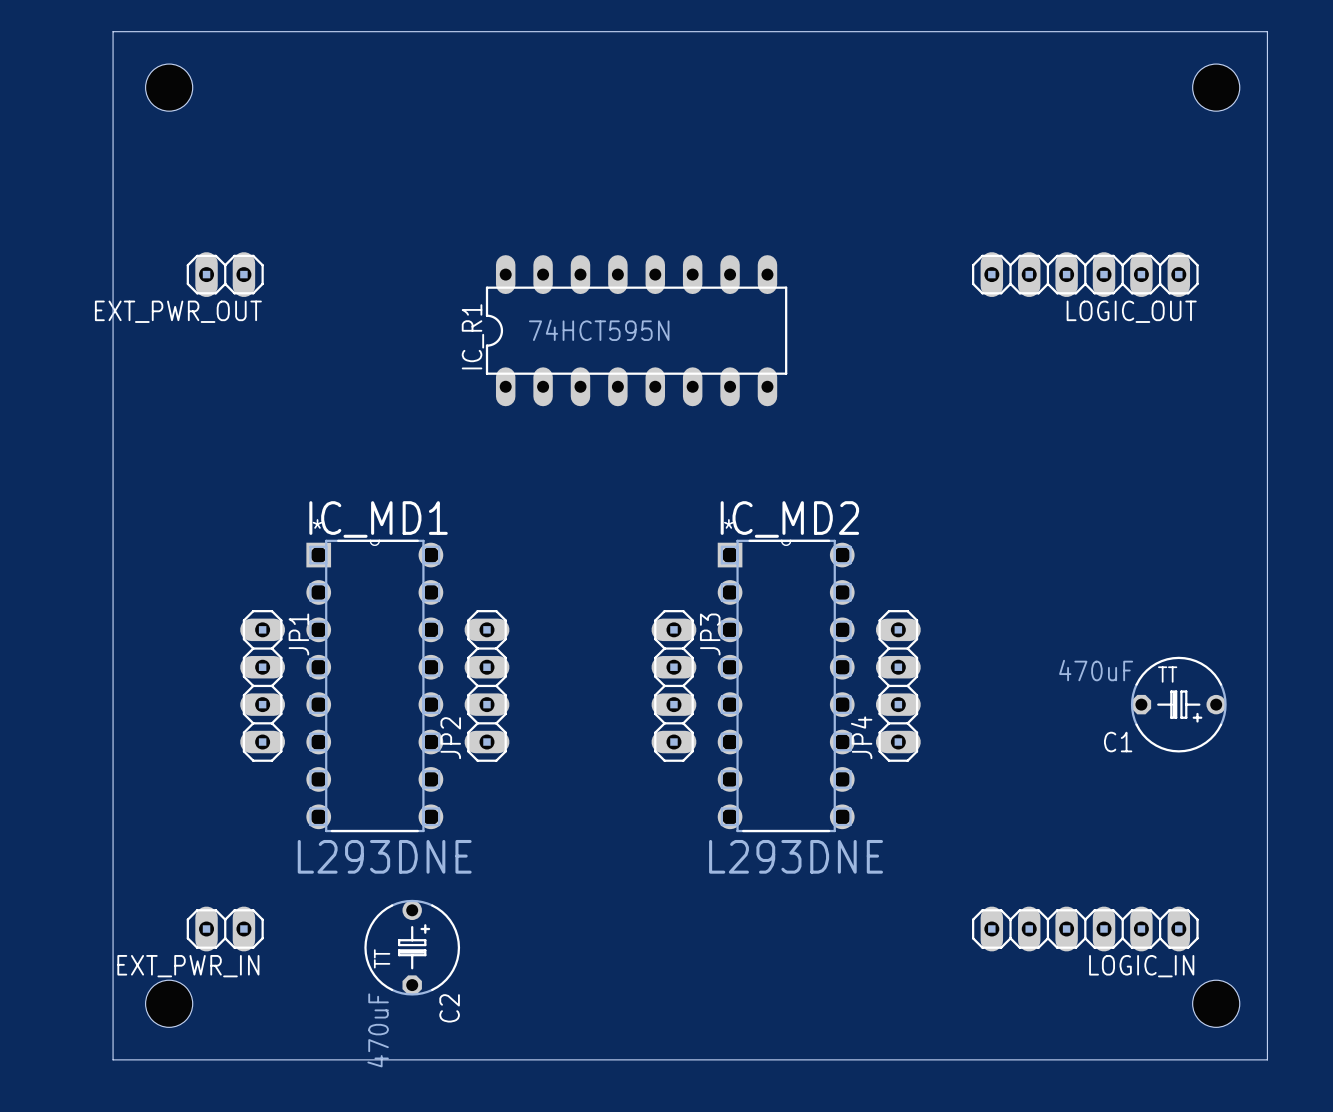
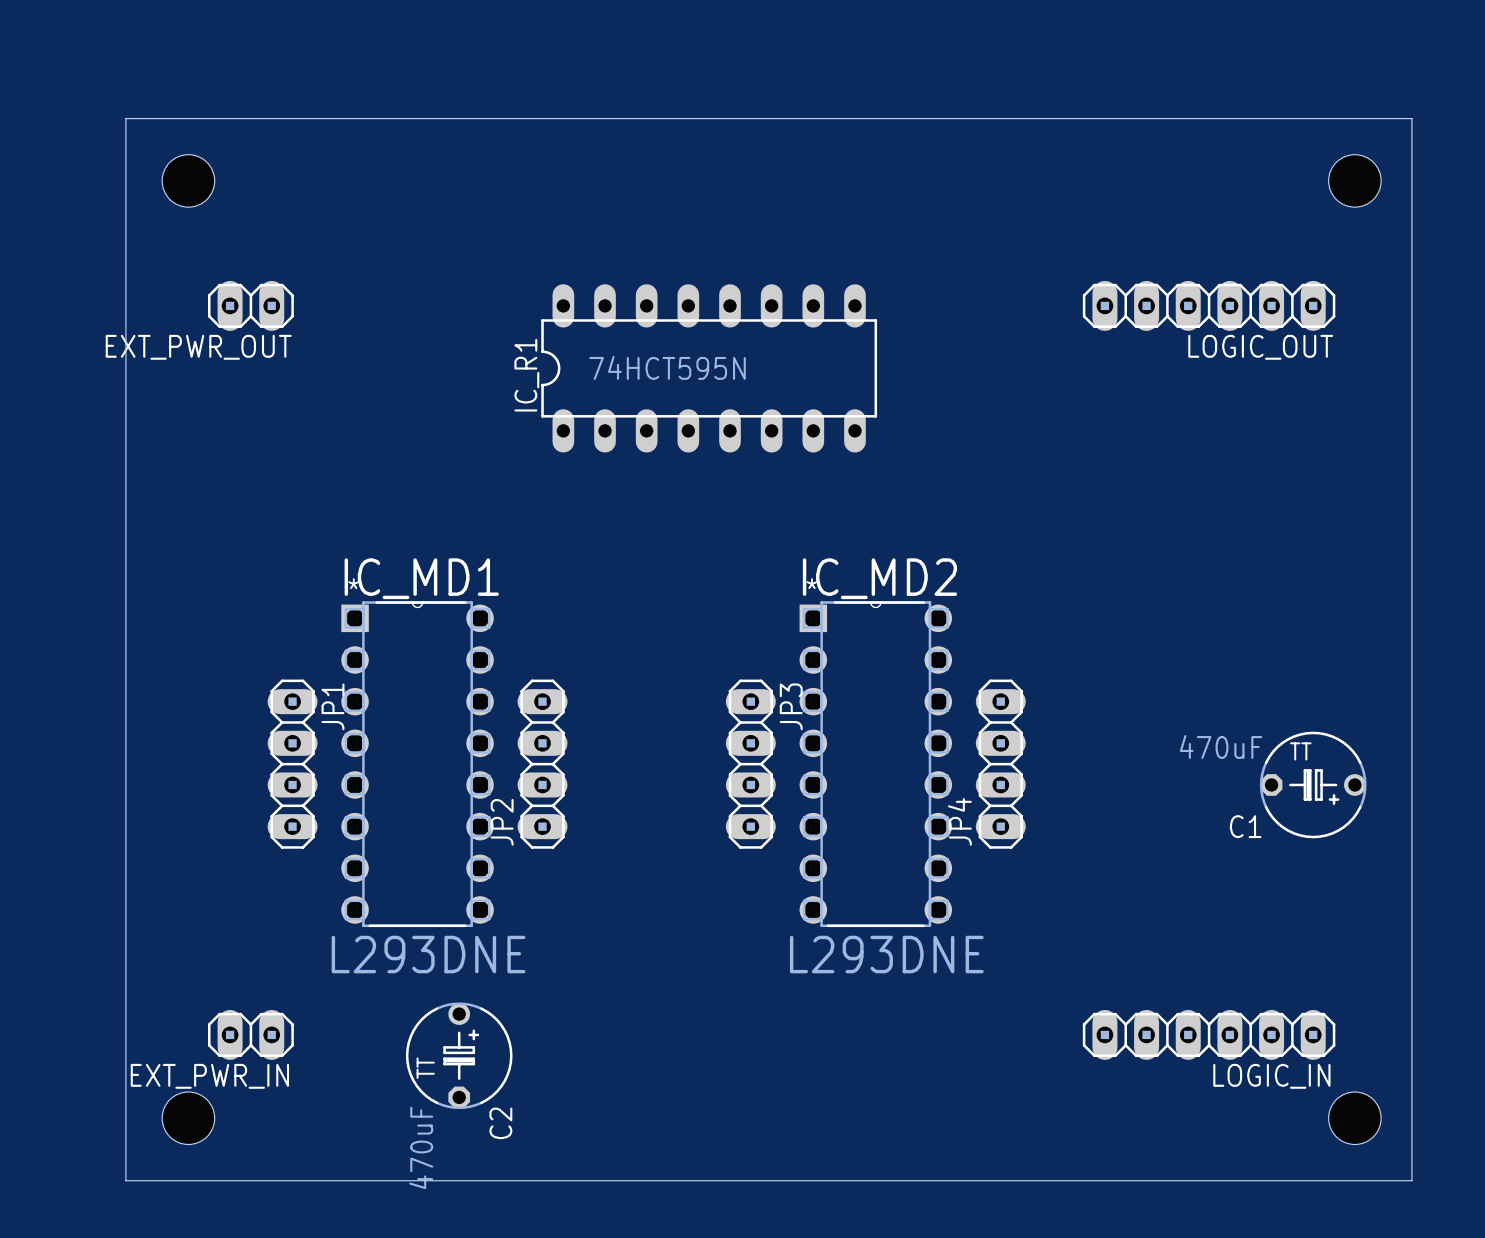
hole position: (169, 87) -> (188, 180)
hole position: (1216, 87) -> (1354, 180)
board edge: (113, 106) (113, 31) (1267, 31) (1267, 106) -> (125, 118) (1411, 118)

